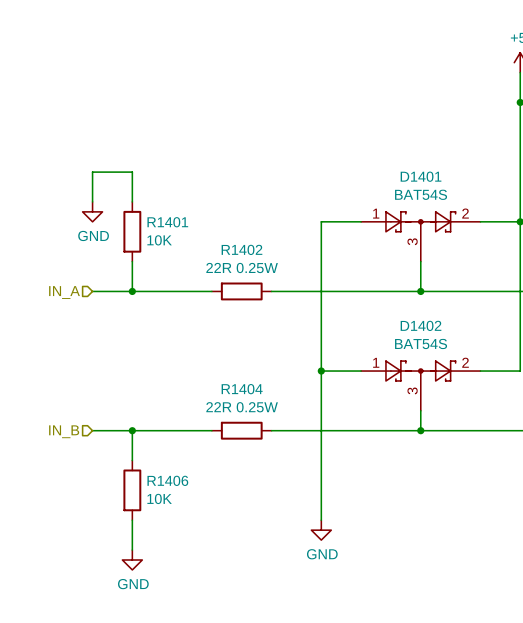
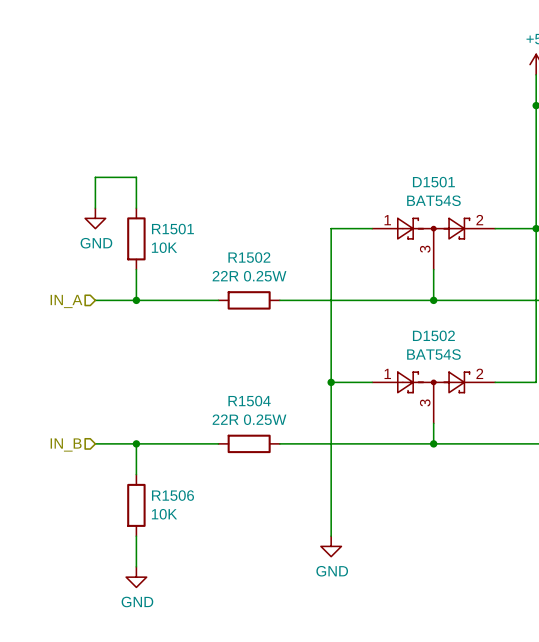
D1401 name: D1401 (421, 176) -> D1501 (433, 182)
R1401 name: R1401 (167, 222) -> R1501 (172, 229)
R1402 name: R1402 (241, 249) -> R1502 (249, 257)
D1402 name: D1402 (421, 325) -> D1502 (433, 335)
R1404 name: R1404 (242, 389) -> R1504 (249, 401)
R1406 name: R1406 (167, 480) -> R1506 (172, 495)

